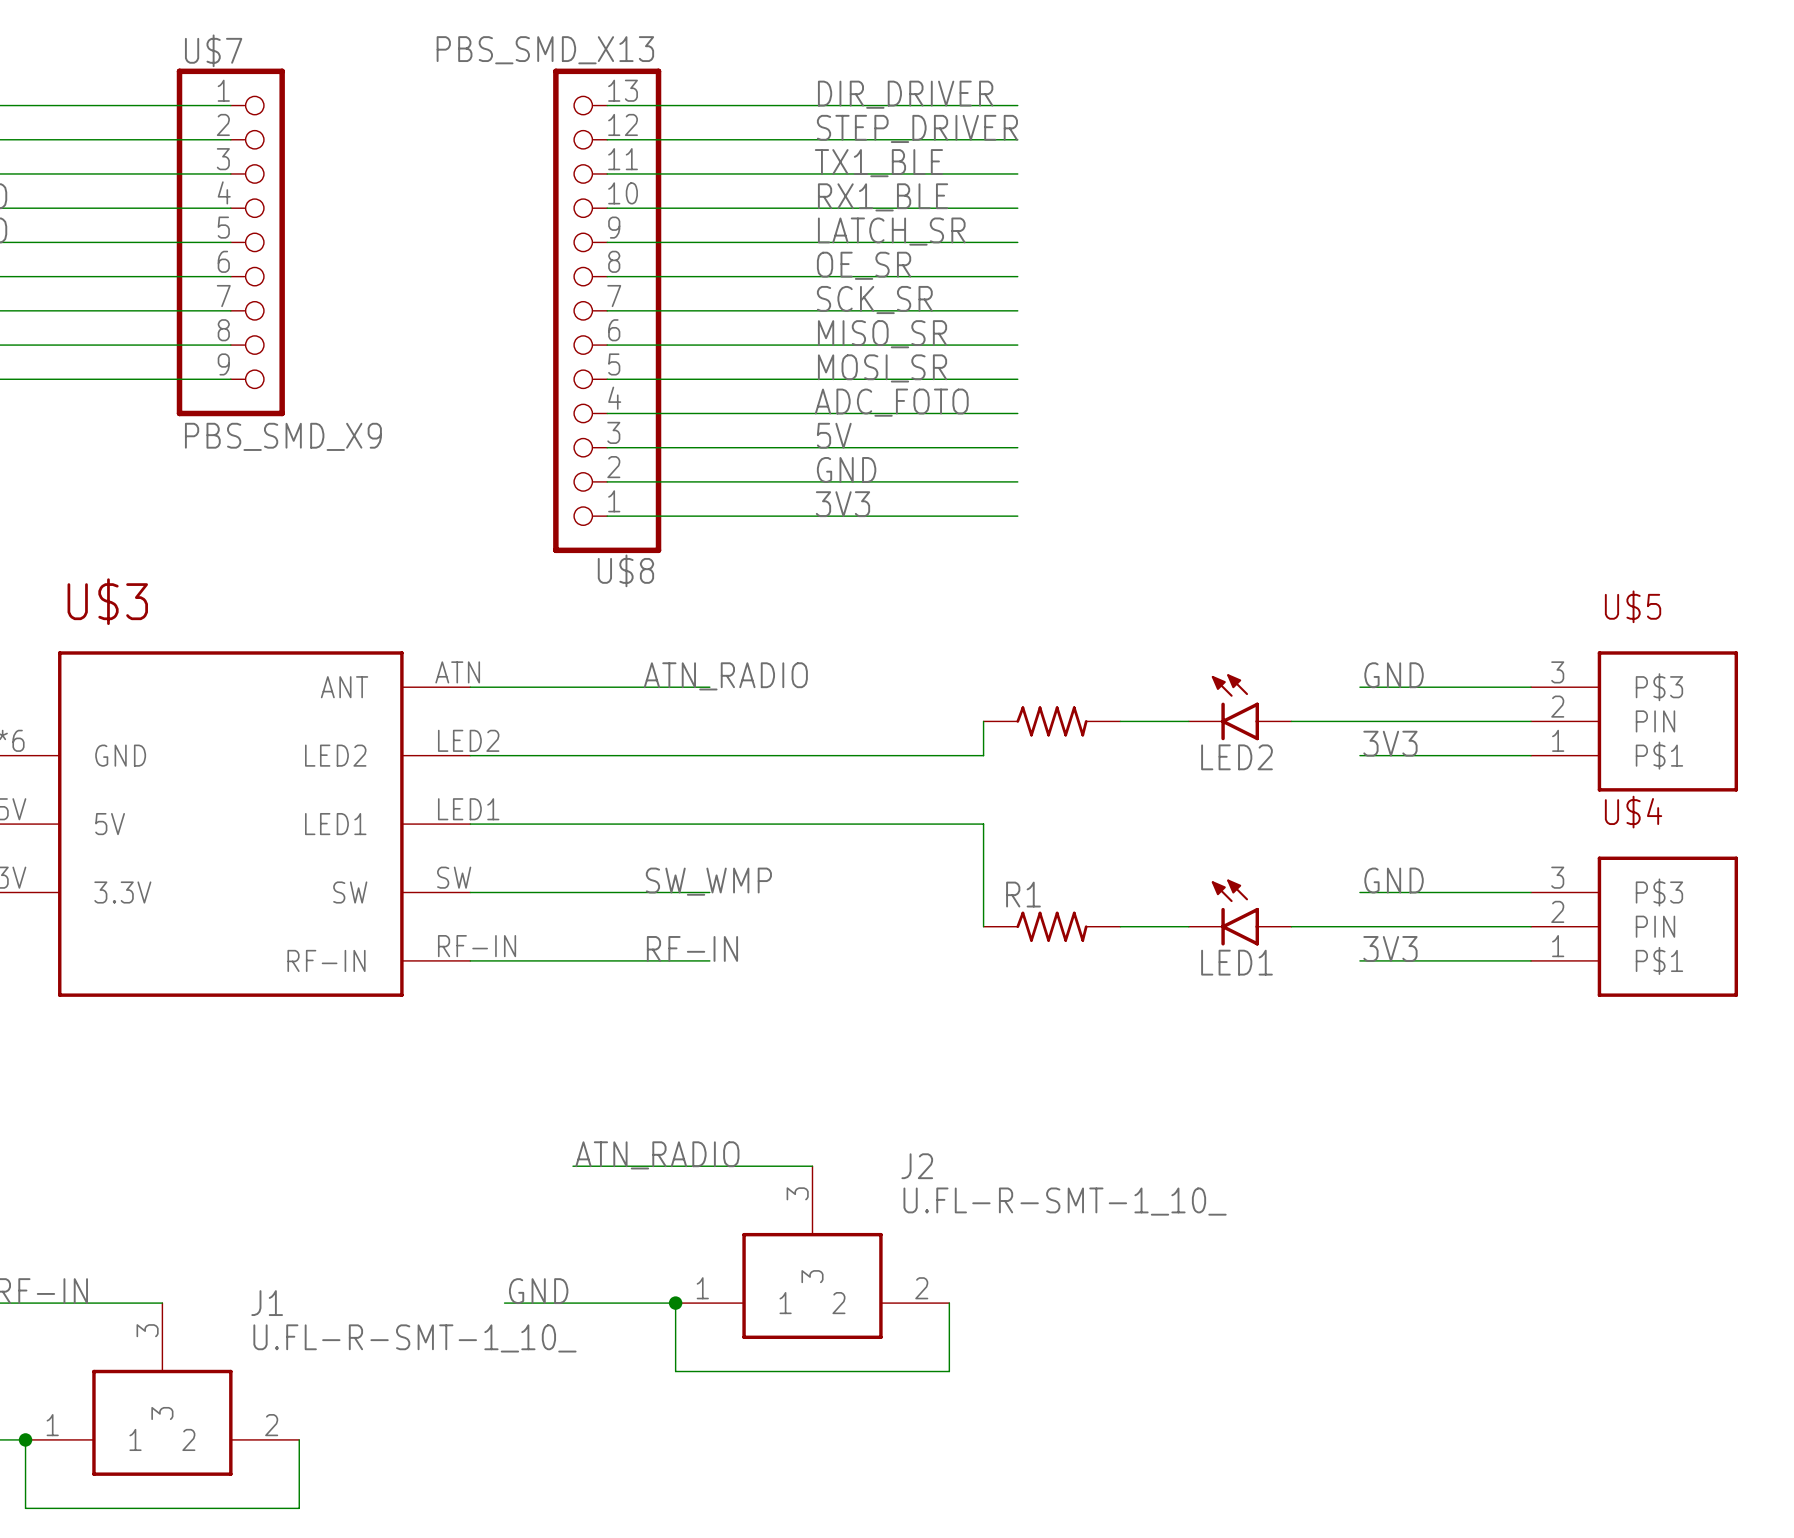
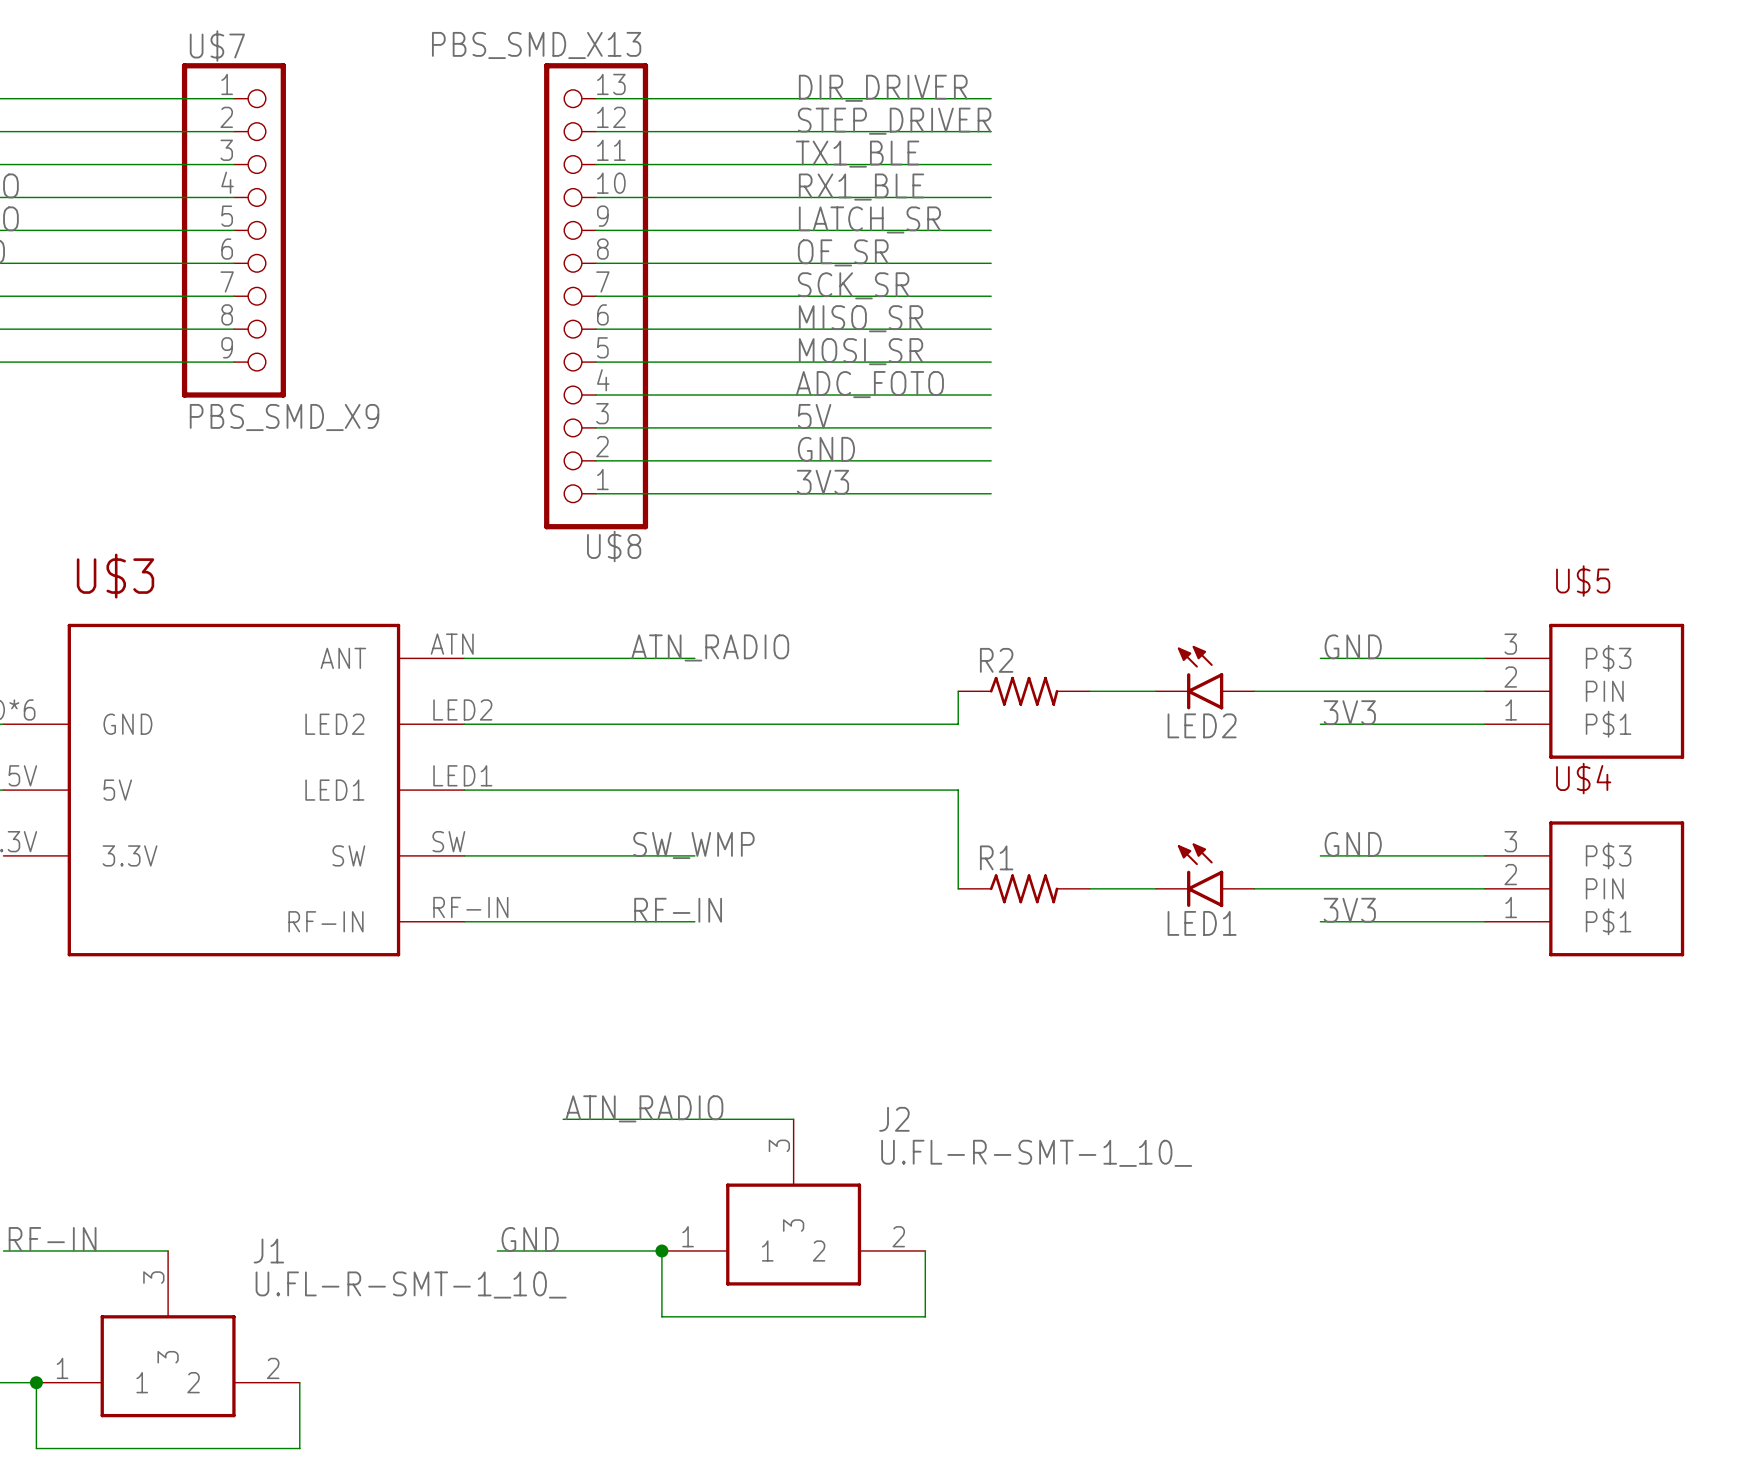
R2 name: none -> R2 (996, 660)

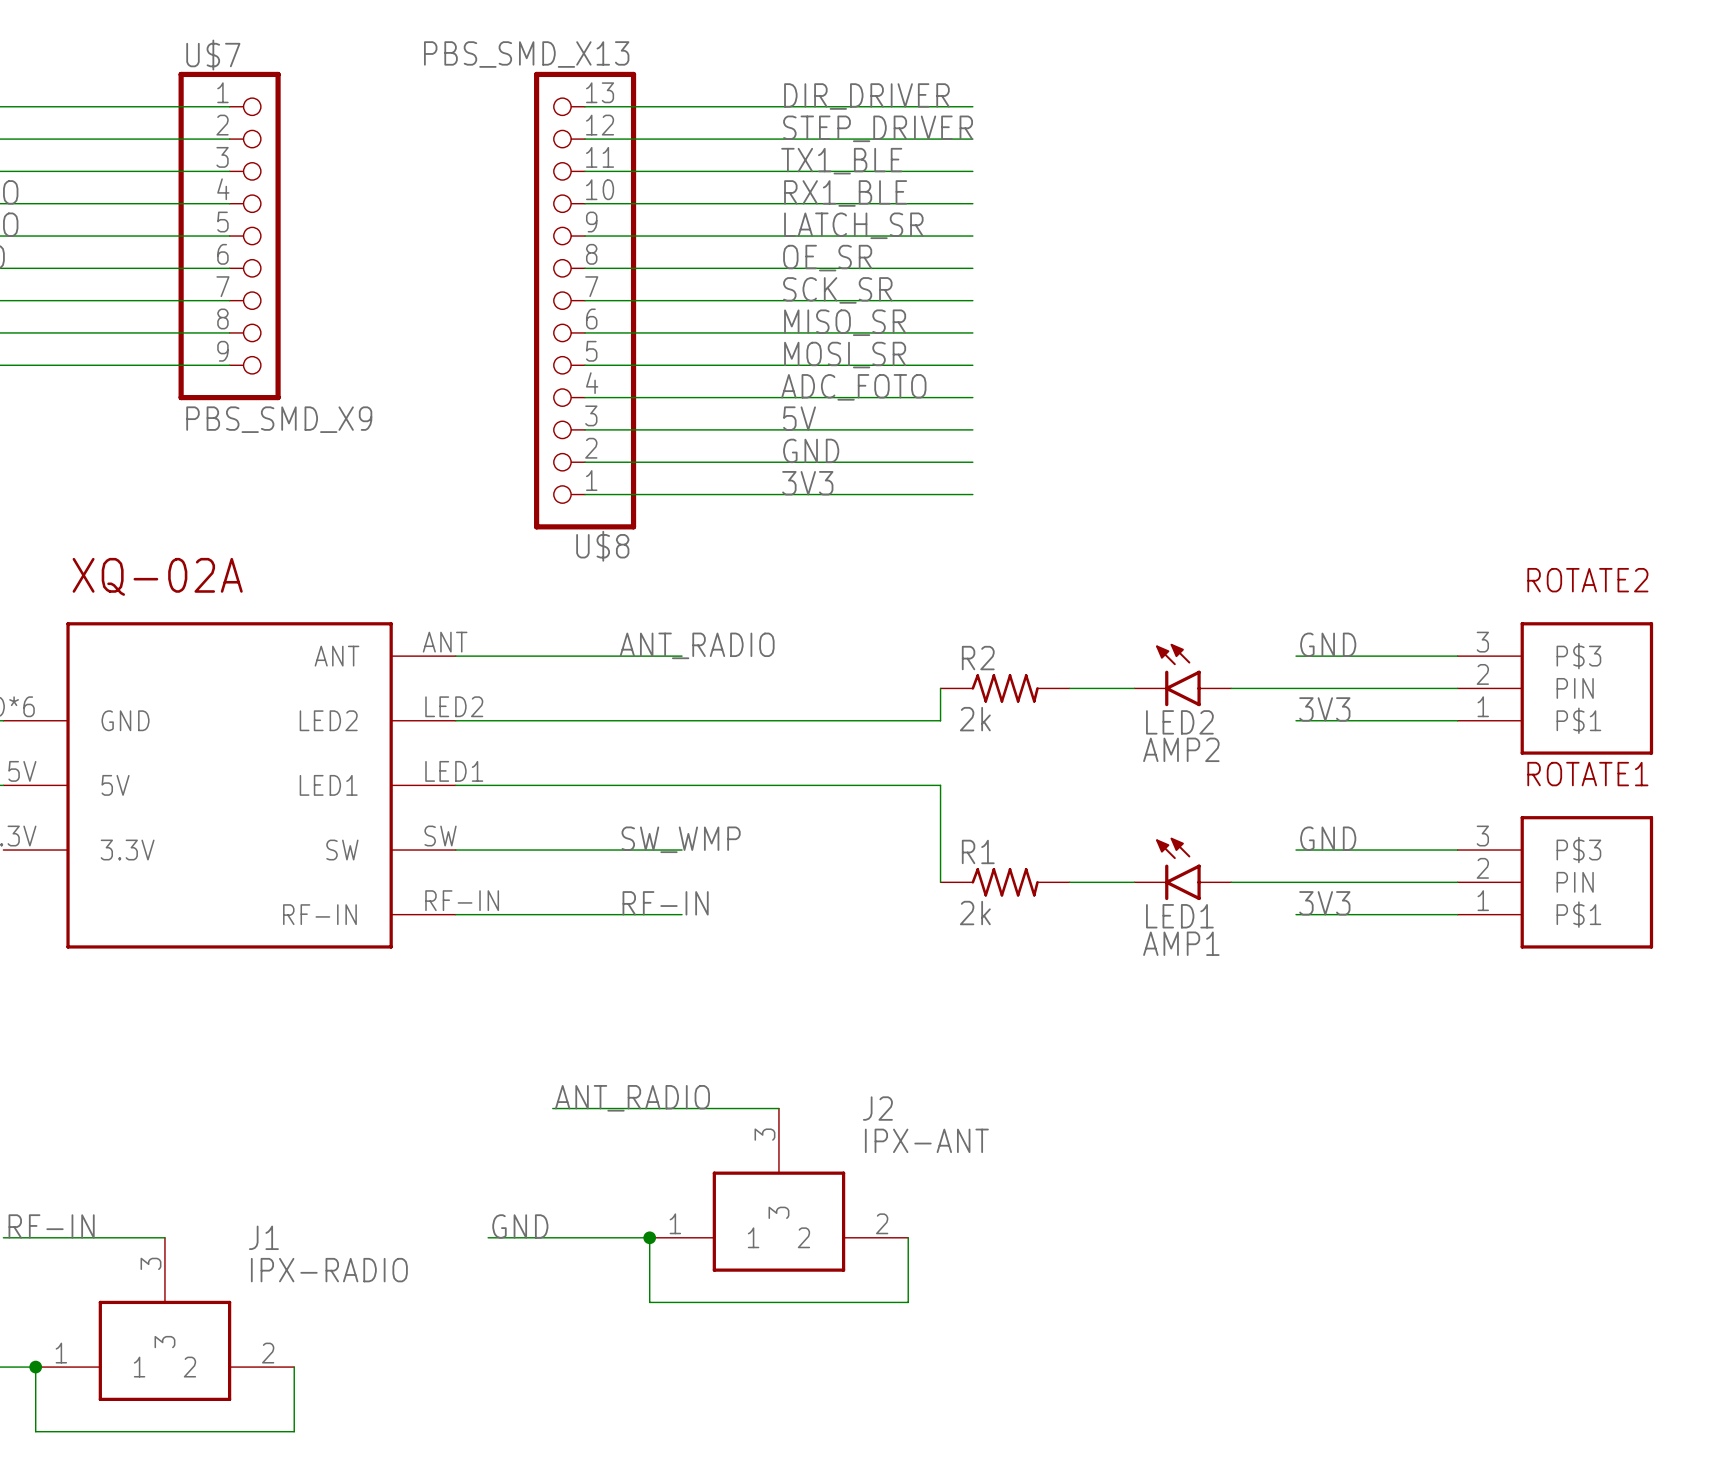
U$3 name: U$3 (115, 576) -> XQ-02A (157, 576)
U$5 name: U$5 (1583, 581) -> ROTATE2 (1587, 580)
U$3 pin number: ATN (452, 644) -> ANT (445, 642)
label: ATN_RADIO (710, 647) -> ANT_RADIO (697, 645)
R2 value: none -> 2k (975, 719)
LED2 value: none -> AMP2 (1181, 749)
U$4 name: U$4 (1583, 778) -> ROTATE1 (1587, 774)
R1 value: none -> 2k (975, 913)
LED1 value: none -> AMP1 (1181, 943)
label: ATN_RADIO (644, 1108) -> ANT_RADIO (632, 1098)
J2 value: U.FL-R-SMT-1_10_ (1036, 1153) -> IPX-ANT (926, 1140)
J1 value: U.FL-R-SMT-1_10_ (411, 1285) -> IPX-RADIO (329, 1270)

